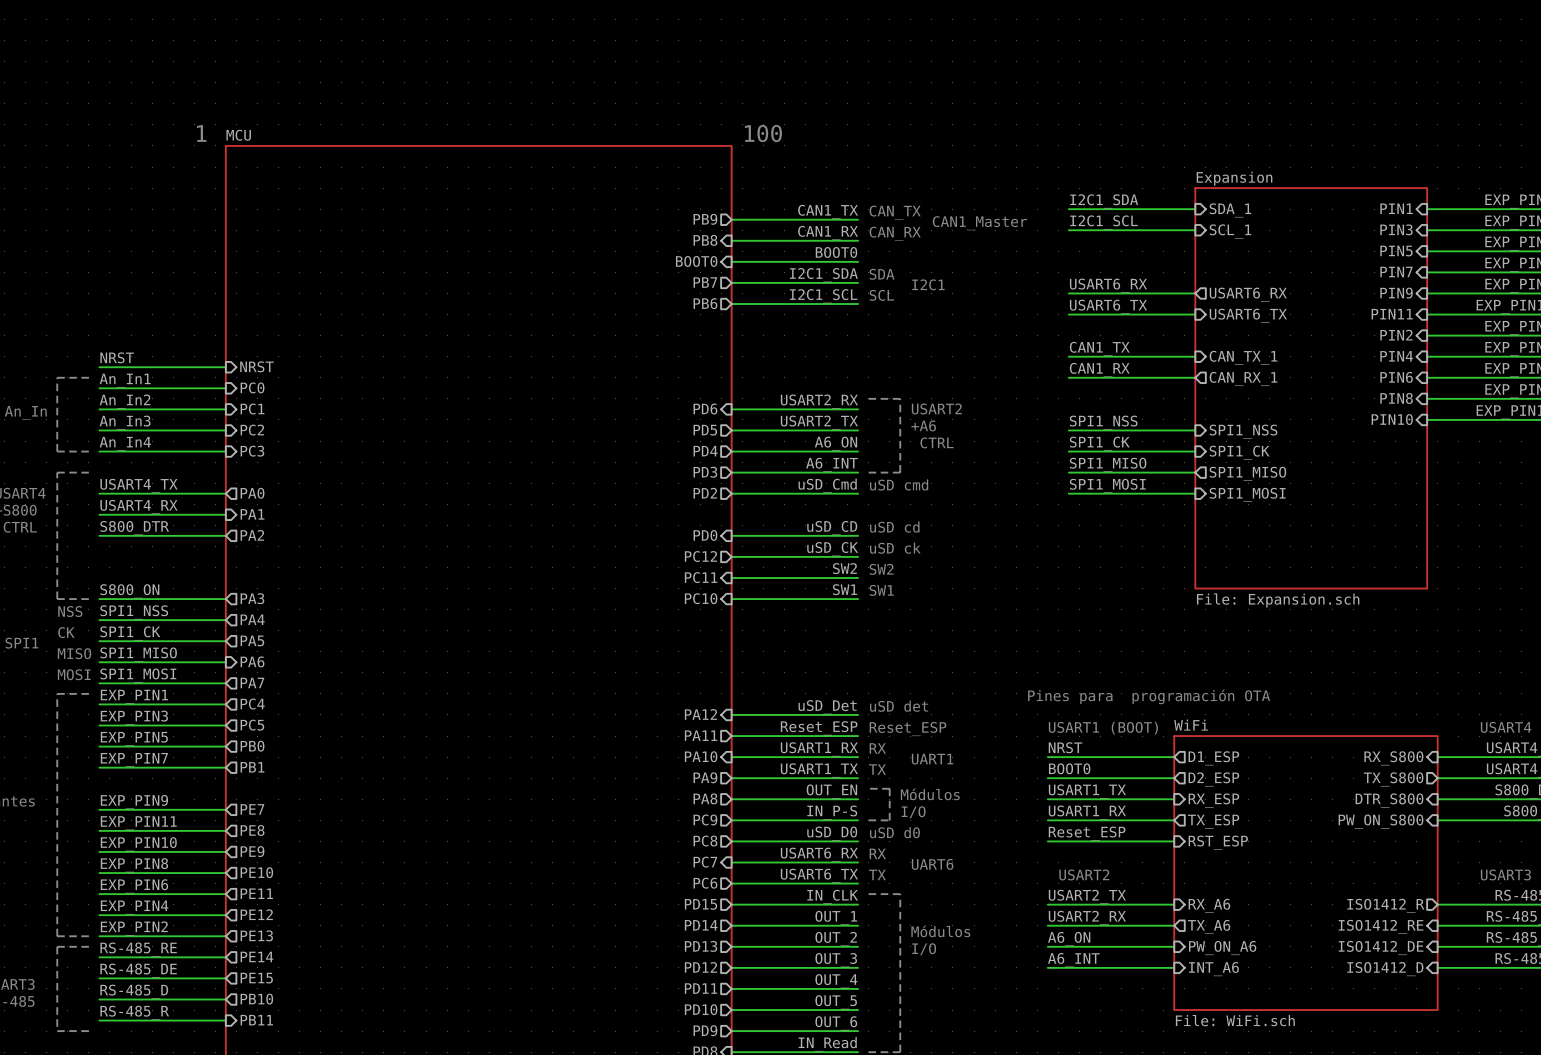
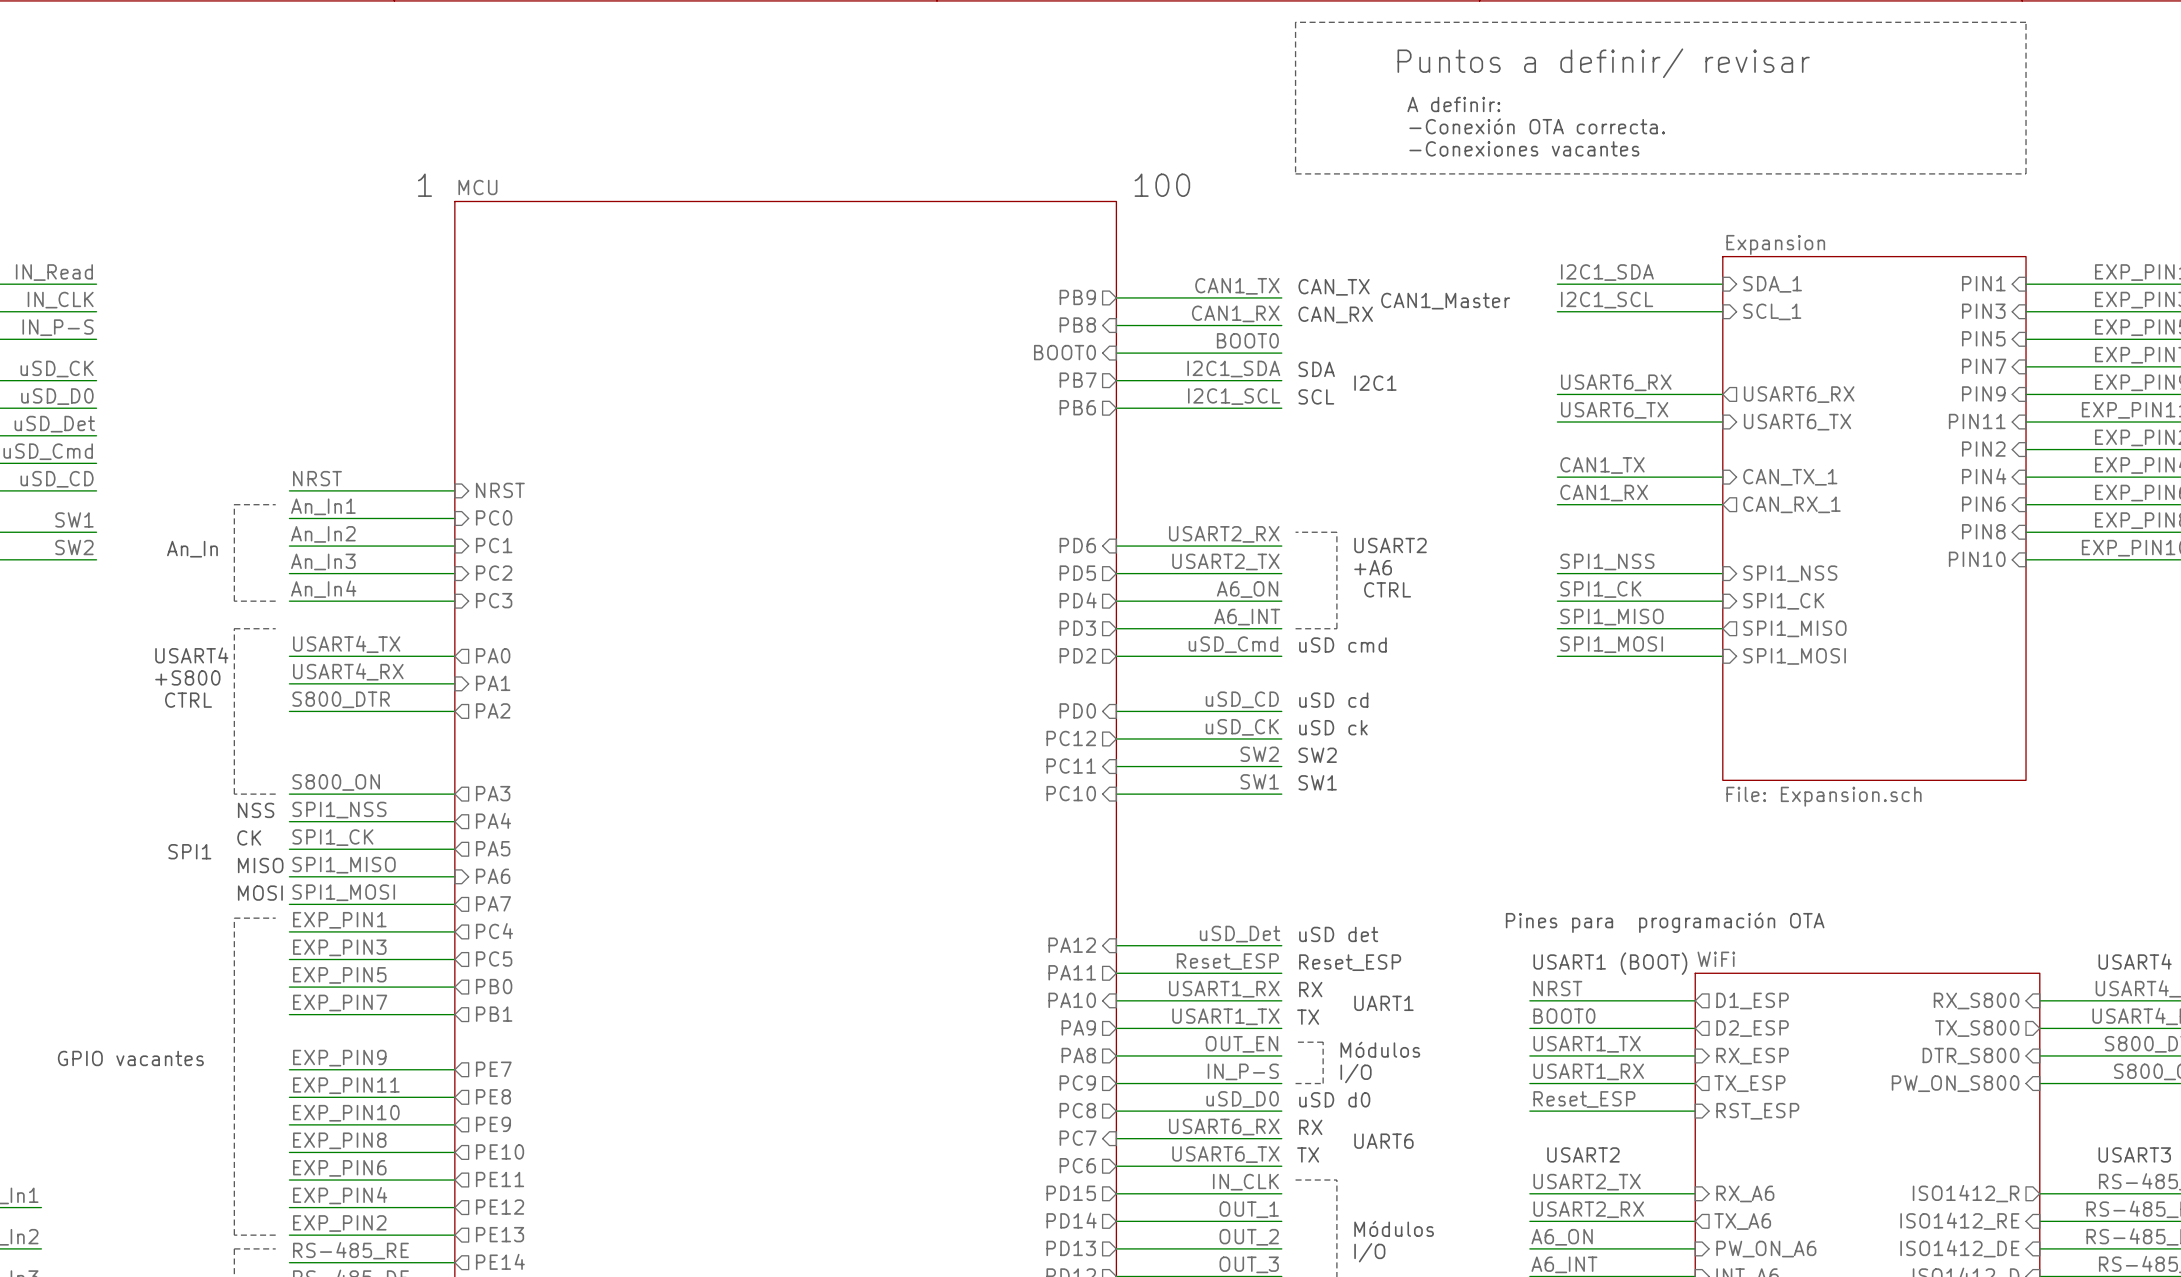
line: none -> (1295, 22) (2026, 22) (2026, 173) (1295, 173) (1295, 22)
text: none -> Puntos a definir/ revisar (1603, 63)
text: none -> A definir: (1453, 104)
text: none -> -Conexión OTA correcta. (1537, 126)
text: none -> -Conexiones vacantes (1524, 148)

